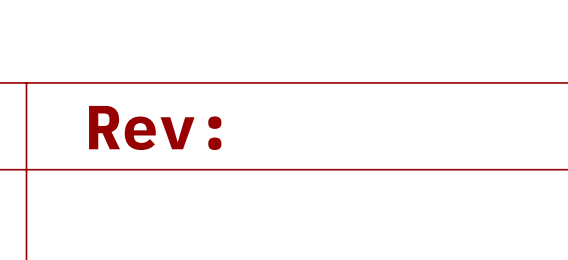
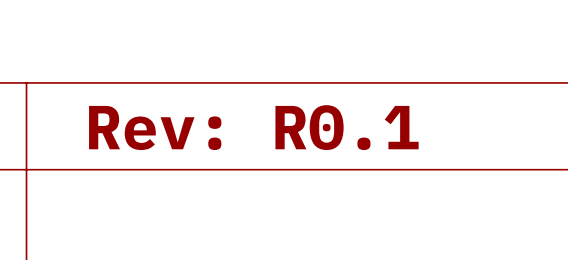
title block: Rev: (155, 127) -> Rev: R0.1 (253, 127)

